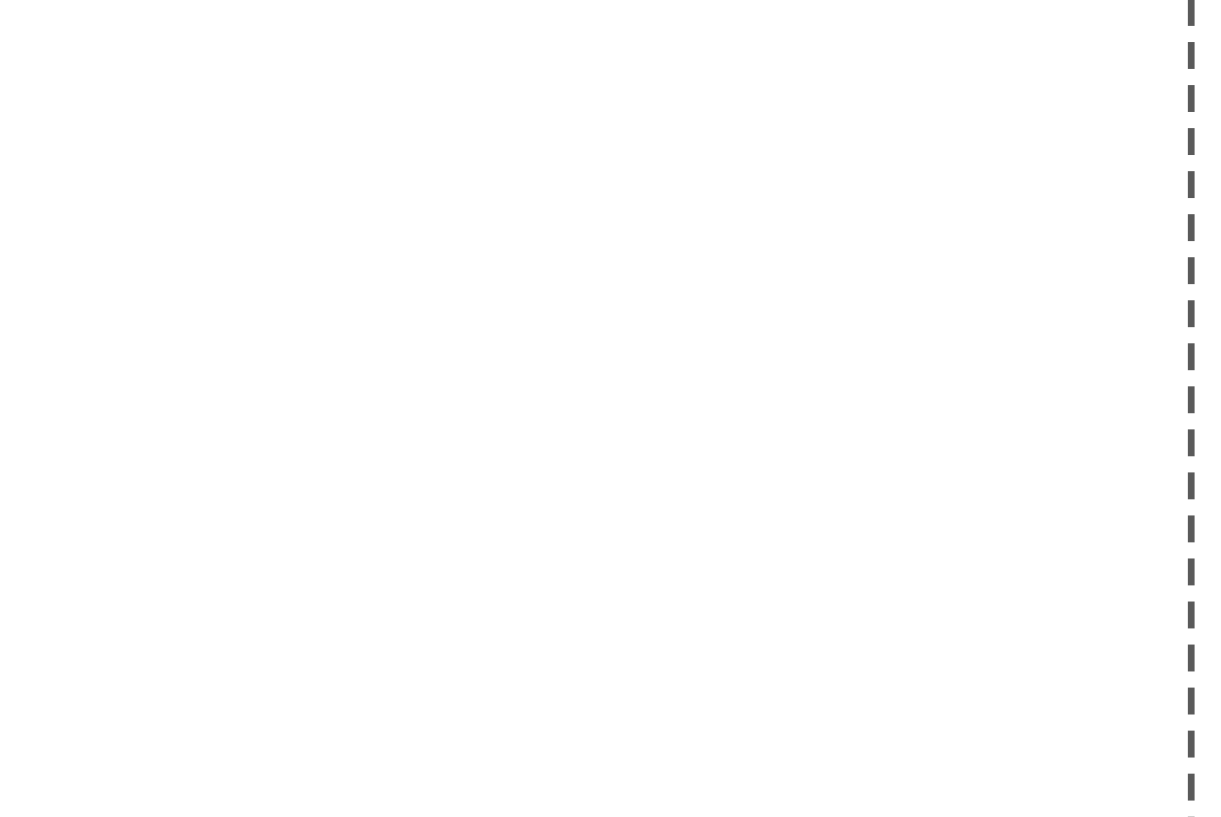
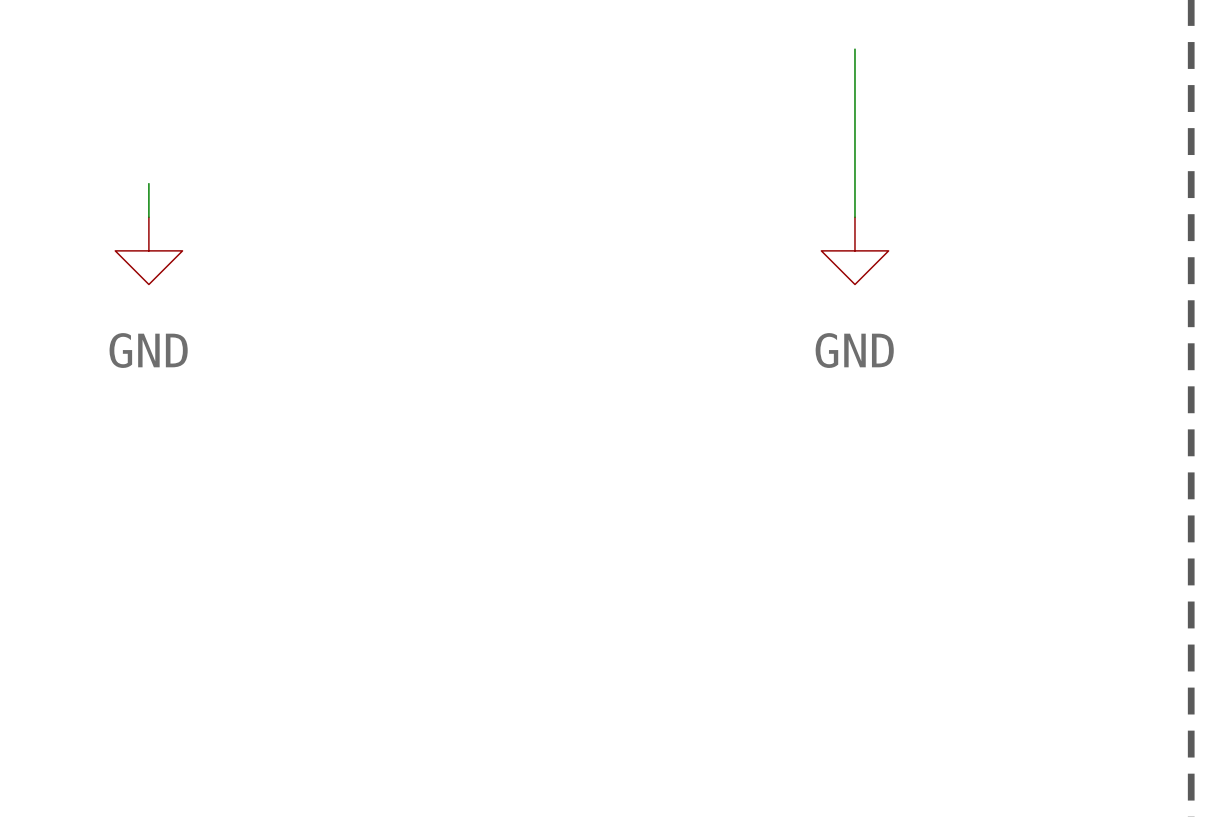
wire: none -> (854, 49) (854, 217)
wire: none -> (148, 183) (148, 217)
power symbol: none -> GND (148, 250)
power symbol: none -> GND (854, 250)

